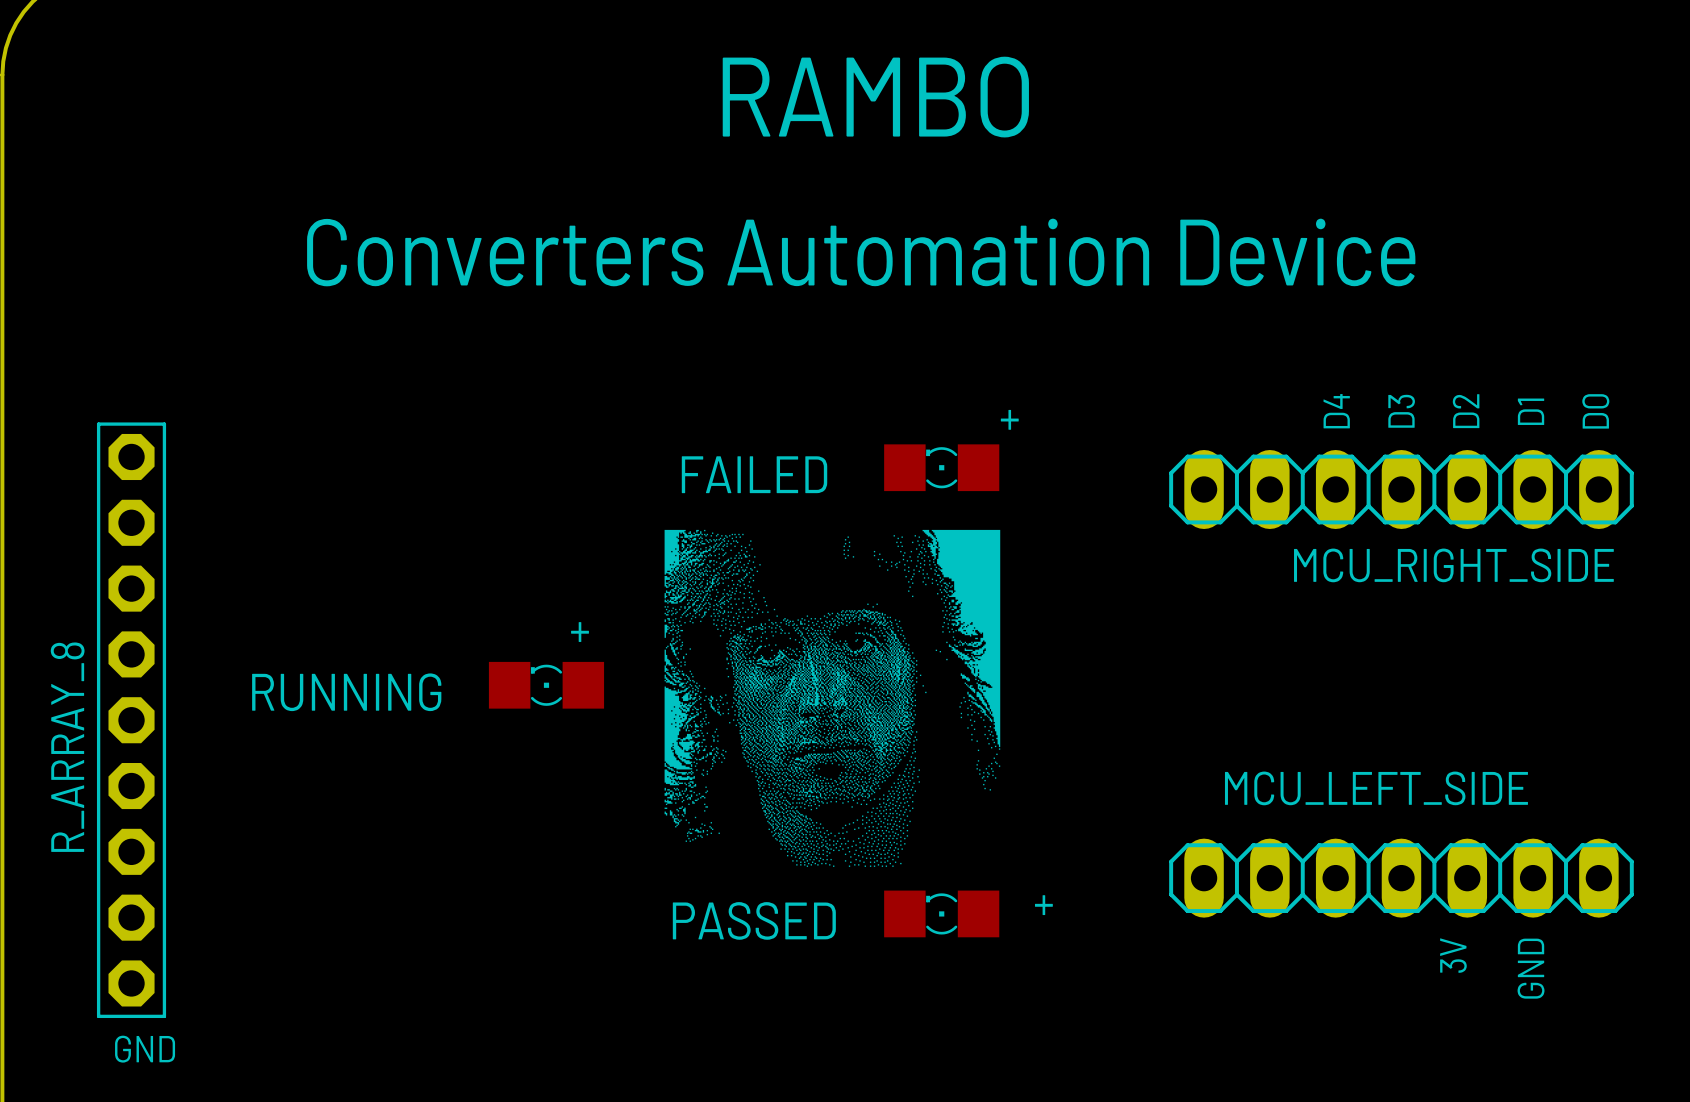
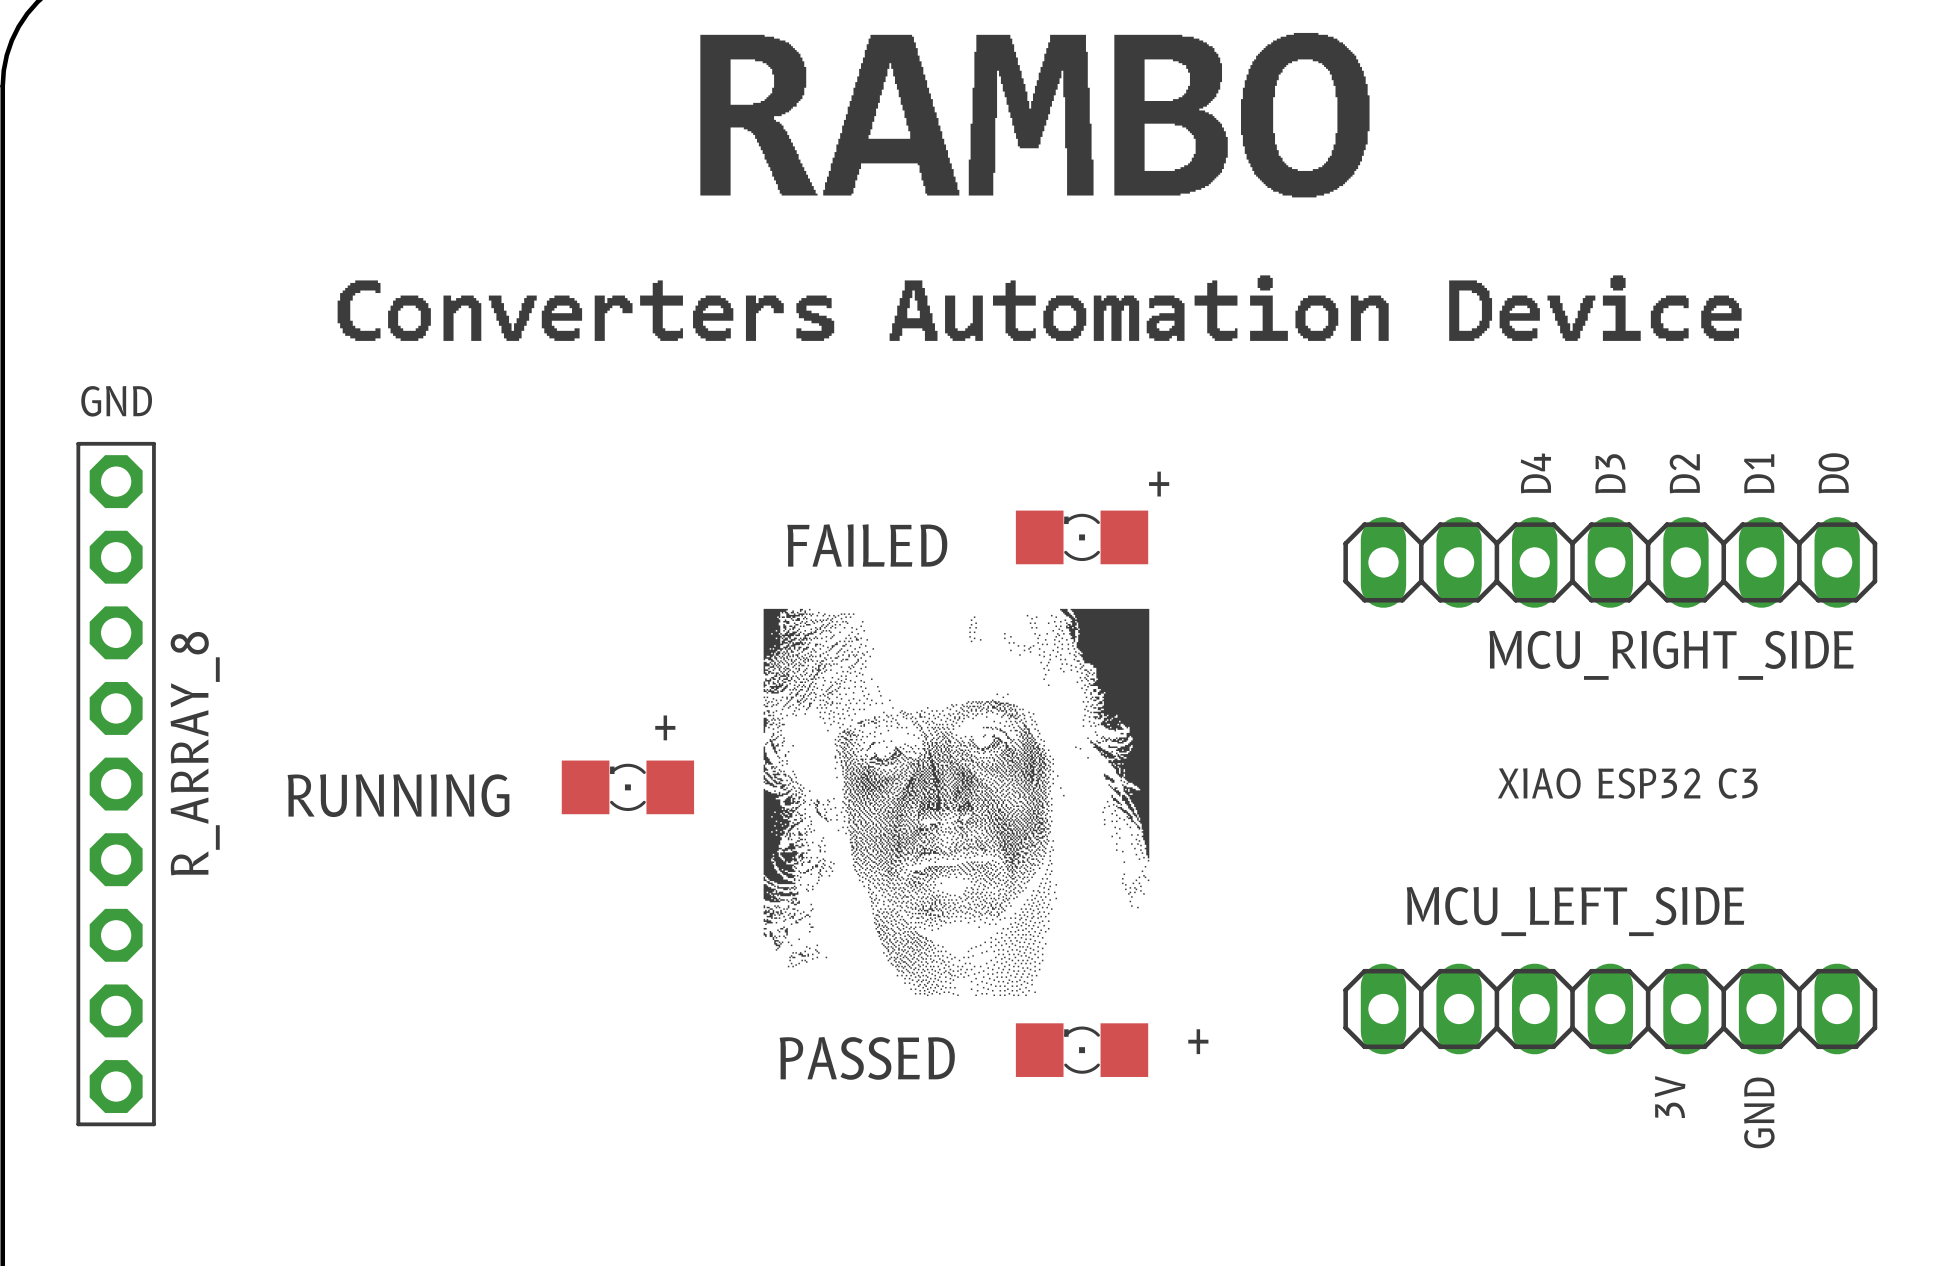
drawing: none -> [700, 32, 1370, 198]
text: RAMBO (875, 97) -> none
drawing: none -> [889, 275, 1389, 341]
drawing: none -> [1449, 275, 1742, 341]
drawing: none -> [337, 280, 835, 341]
text: Converters Automation Device (861, 252) -> none
text: none -> GND (116, 401)
text: none -> XIAO ESP32 C3 (1627, 783)
R_ARRAY_8 position: (131, 720) -> (116, 784)
R_ARRAY_8 name position: R_ARRAY_8 (67, 747) -> R_ARRAY_8 (195, 753)
text: GND (145, 1049) -> none

